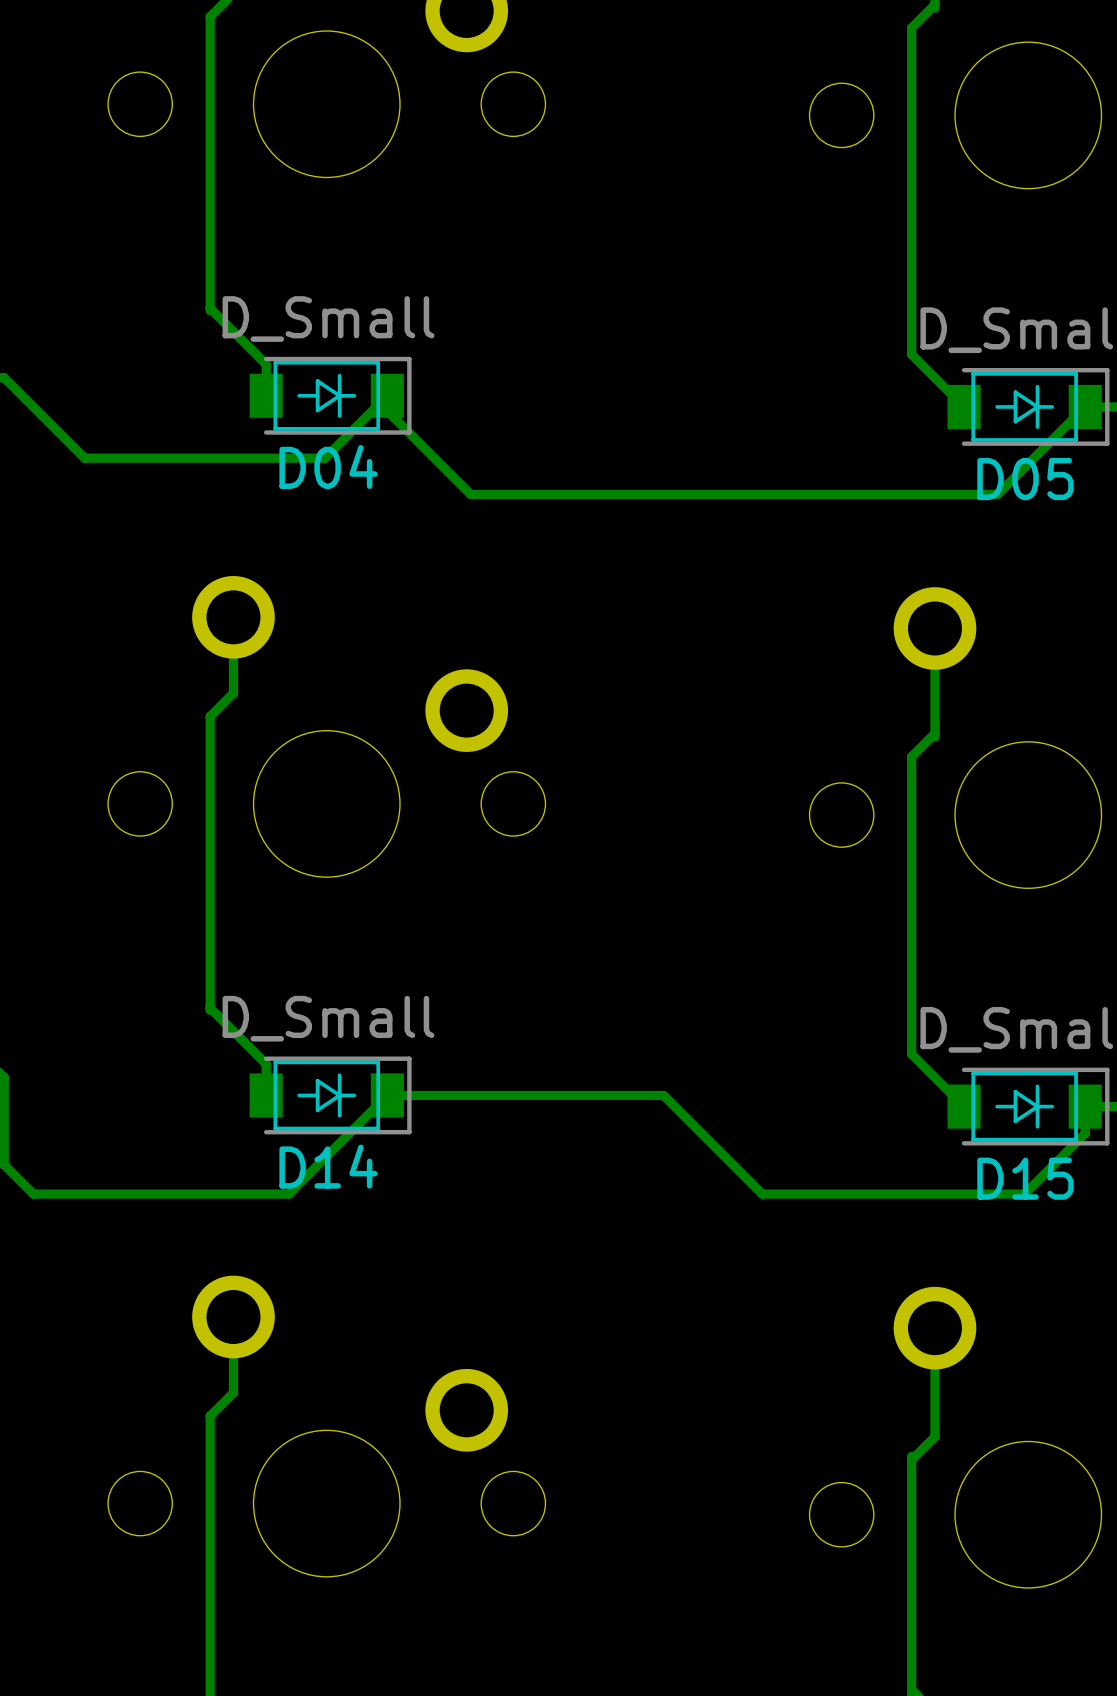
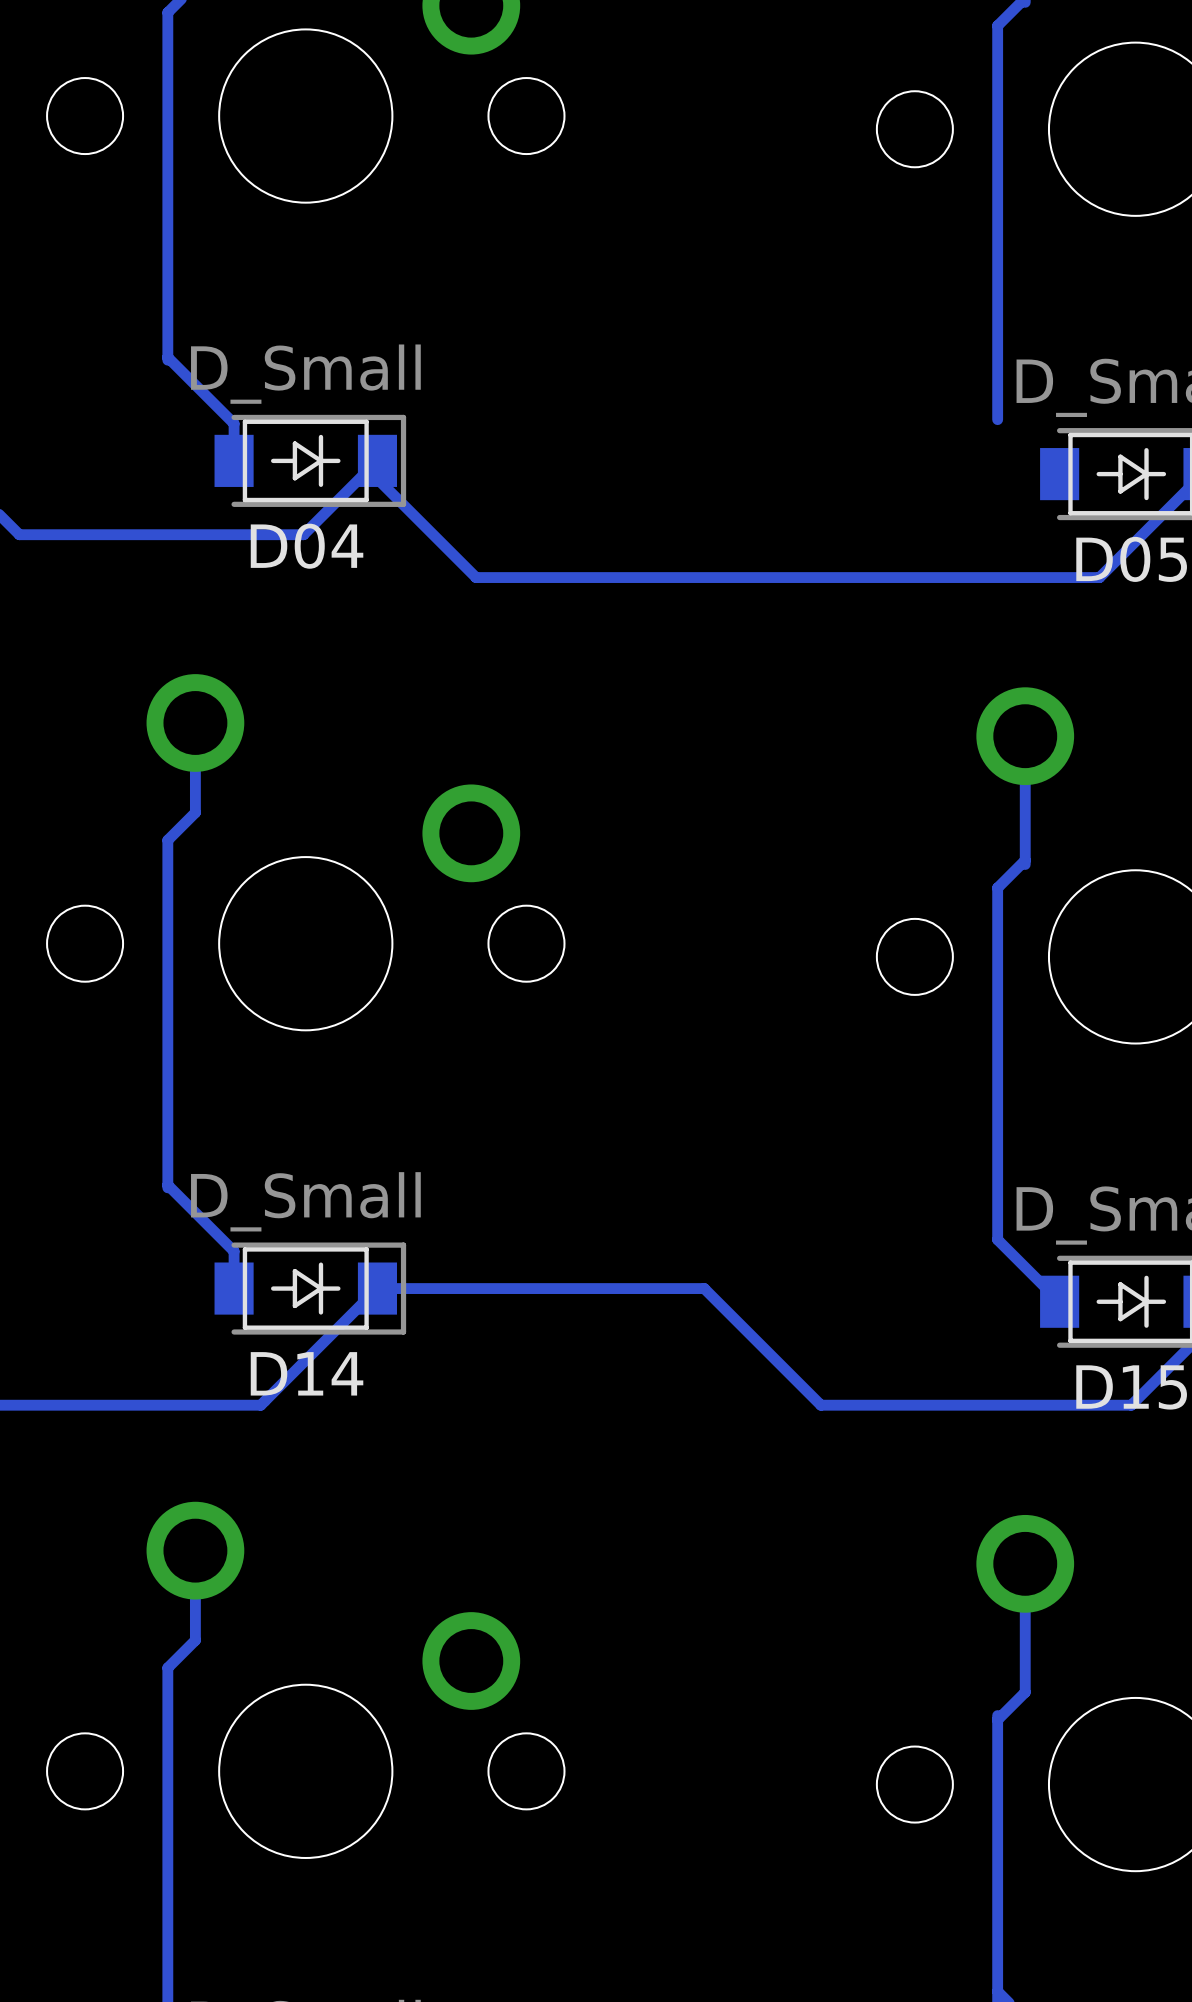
track: (911, 354) (964, 406) -> (997, 412) (997, 419)

